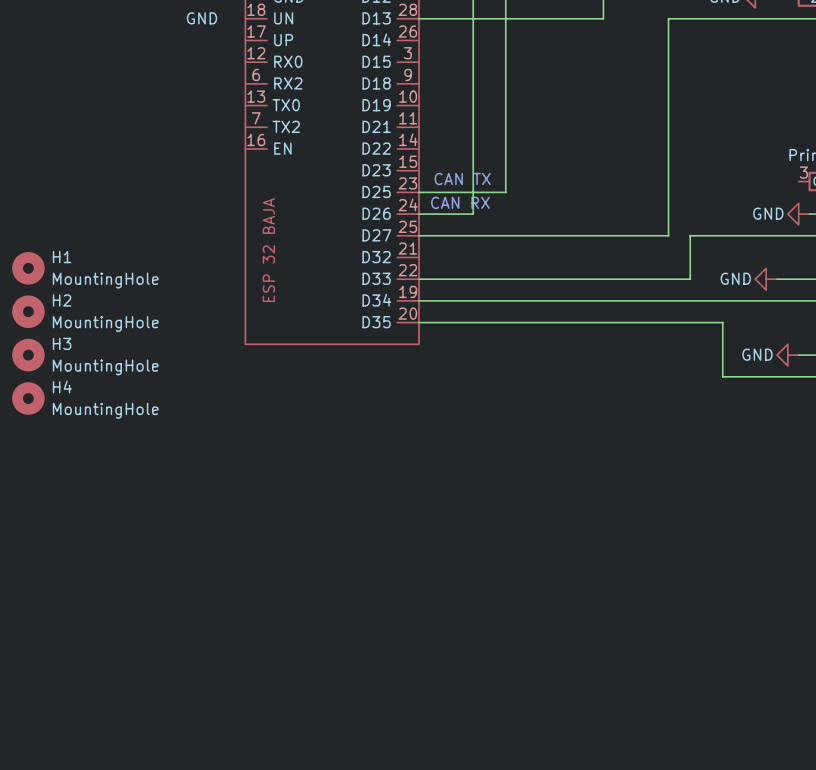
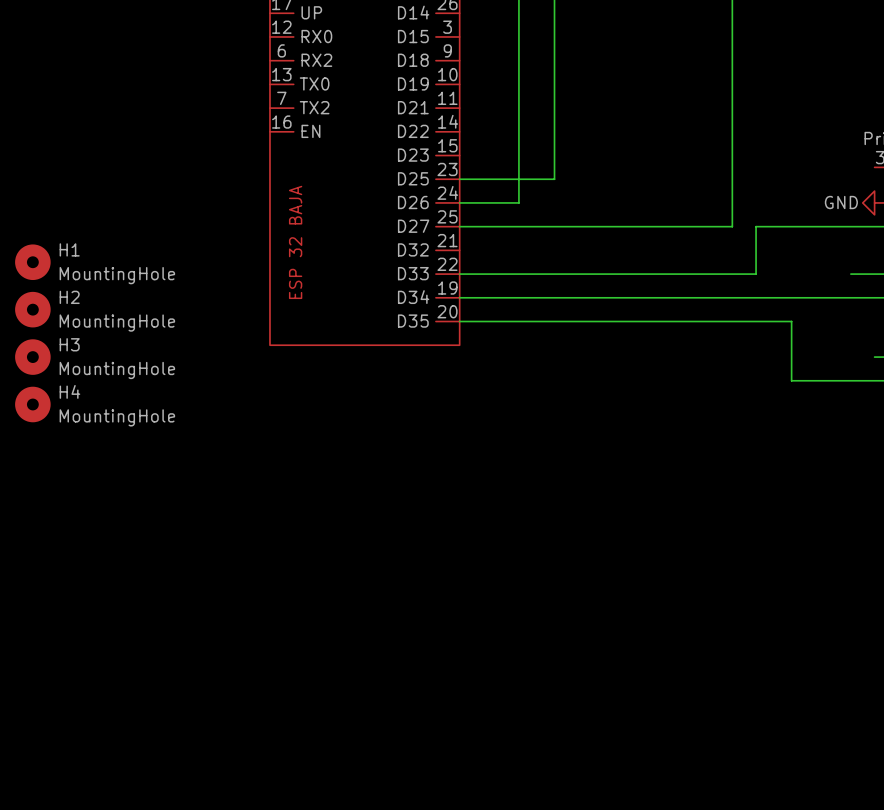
text: CAN TX (462, 178) -> none
text: CAN RX (460, 202) -> none
power symbol: GND (766, 279) -> none
power symbol: GND (787, 355) -> none

